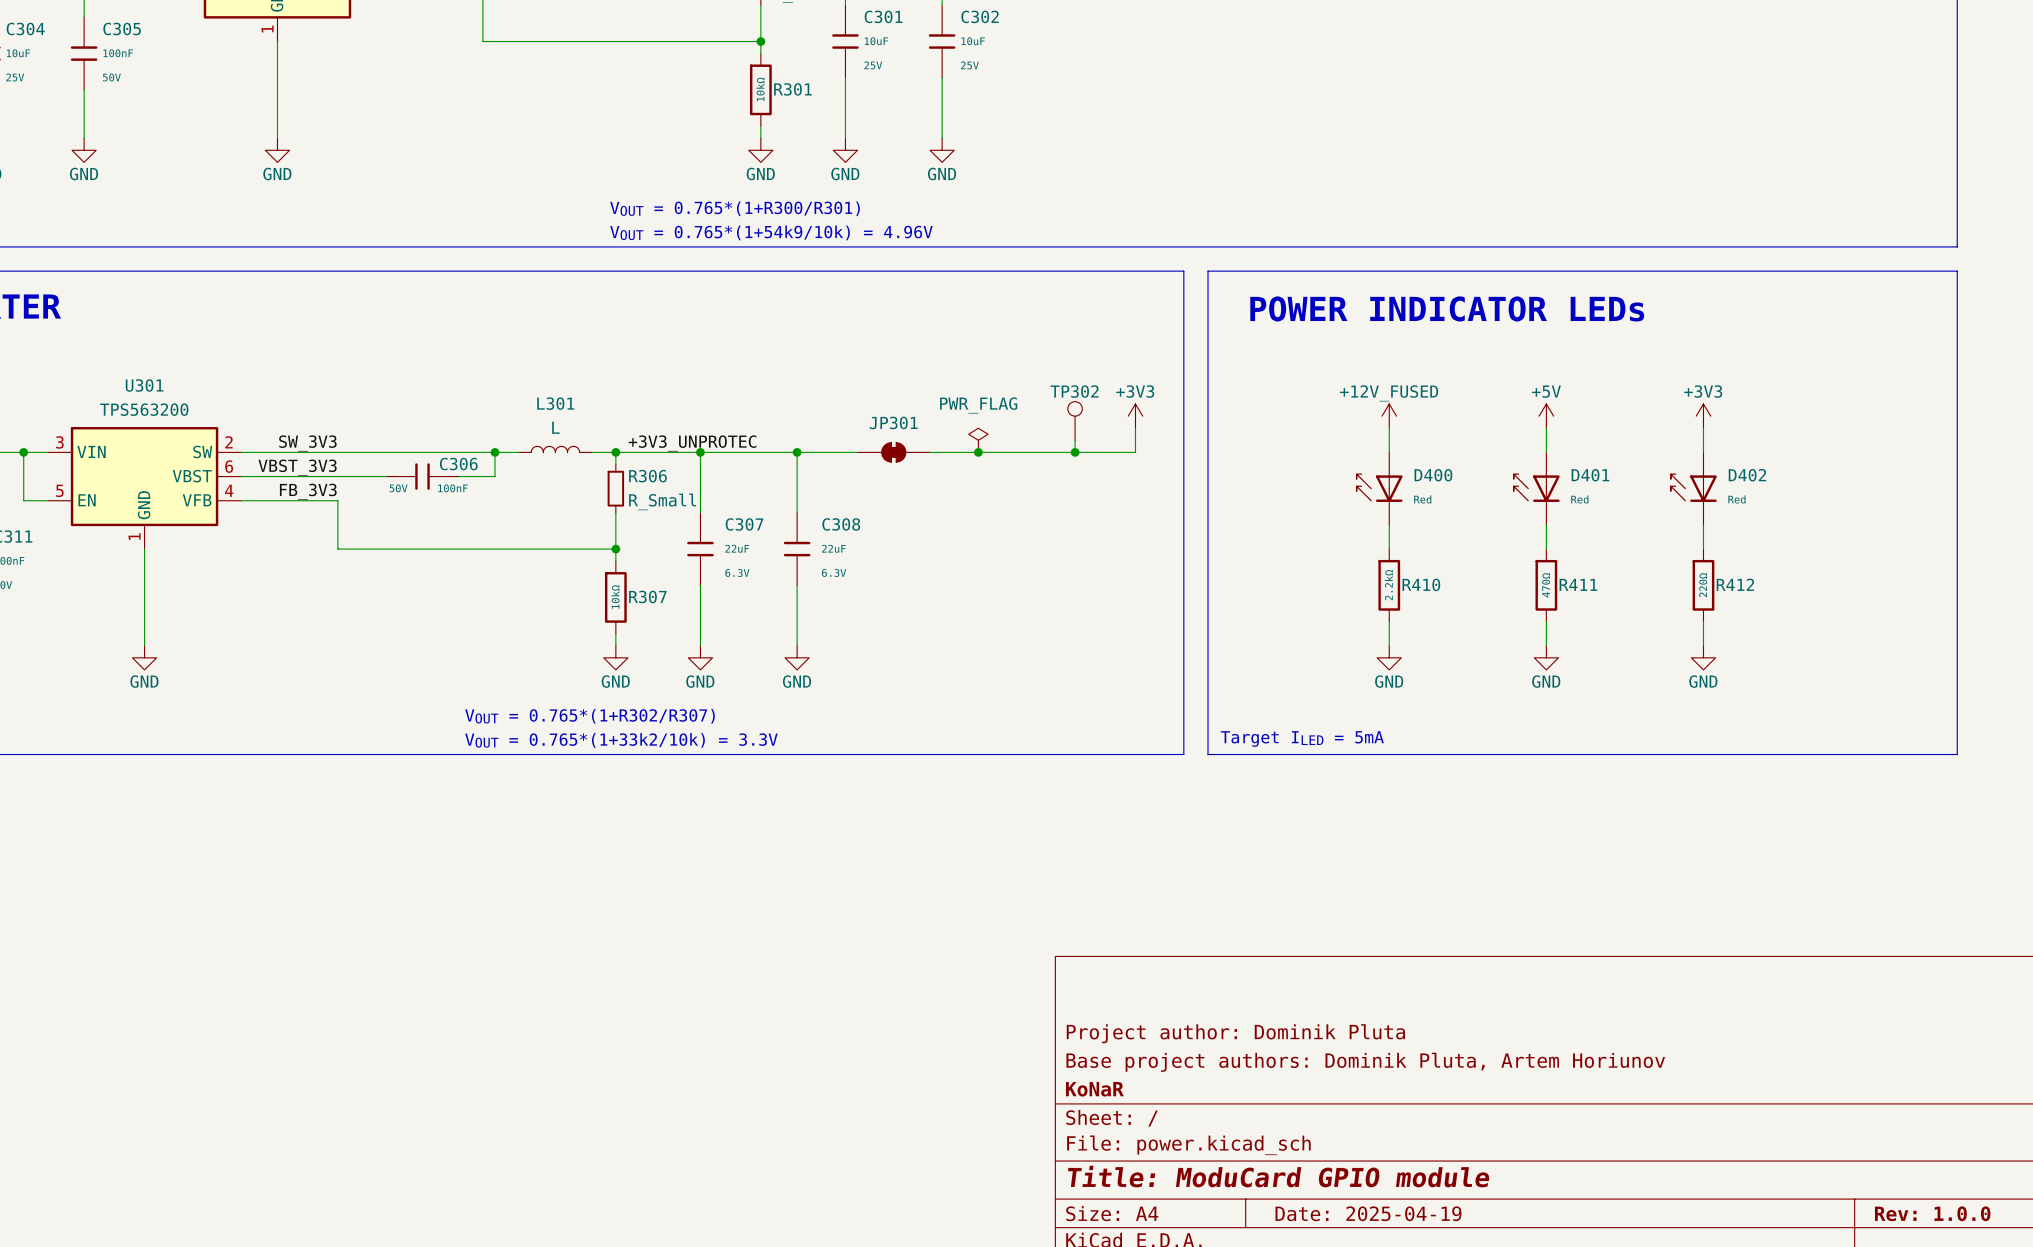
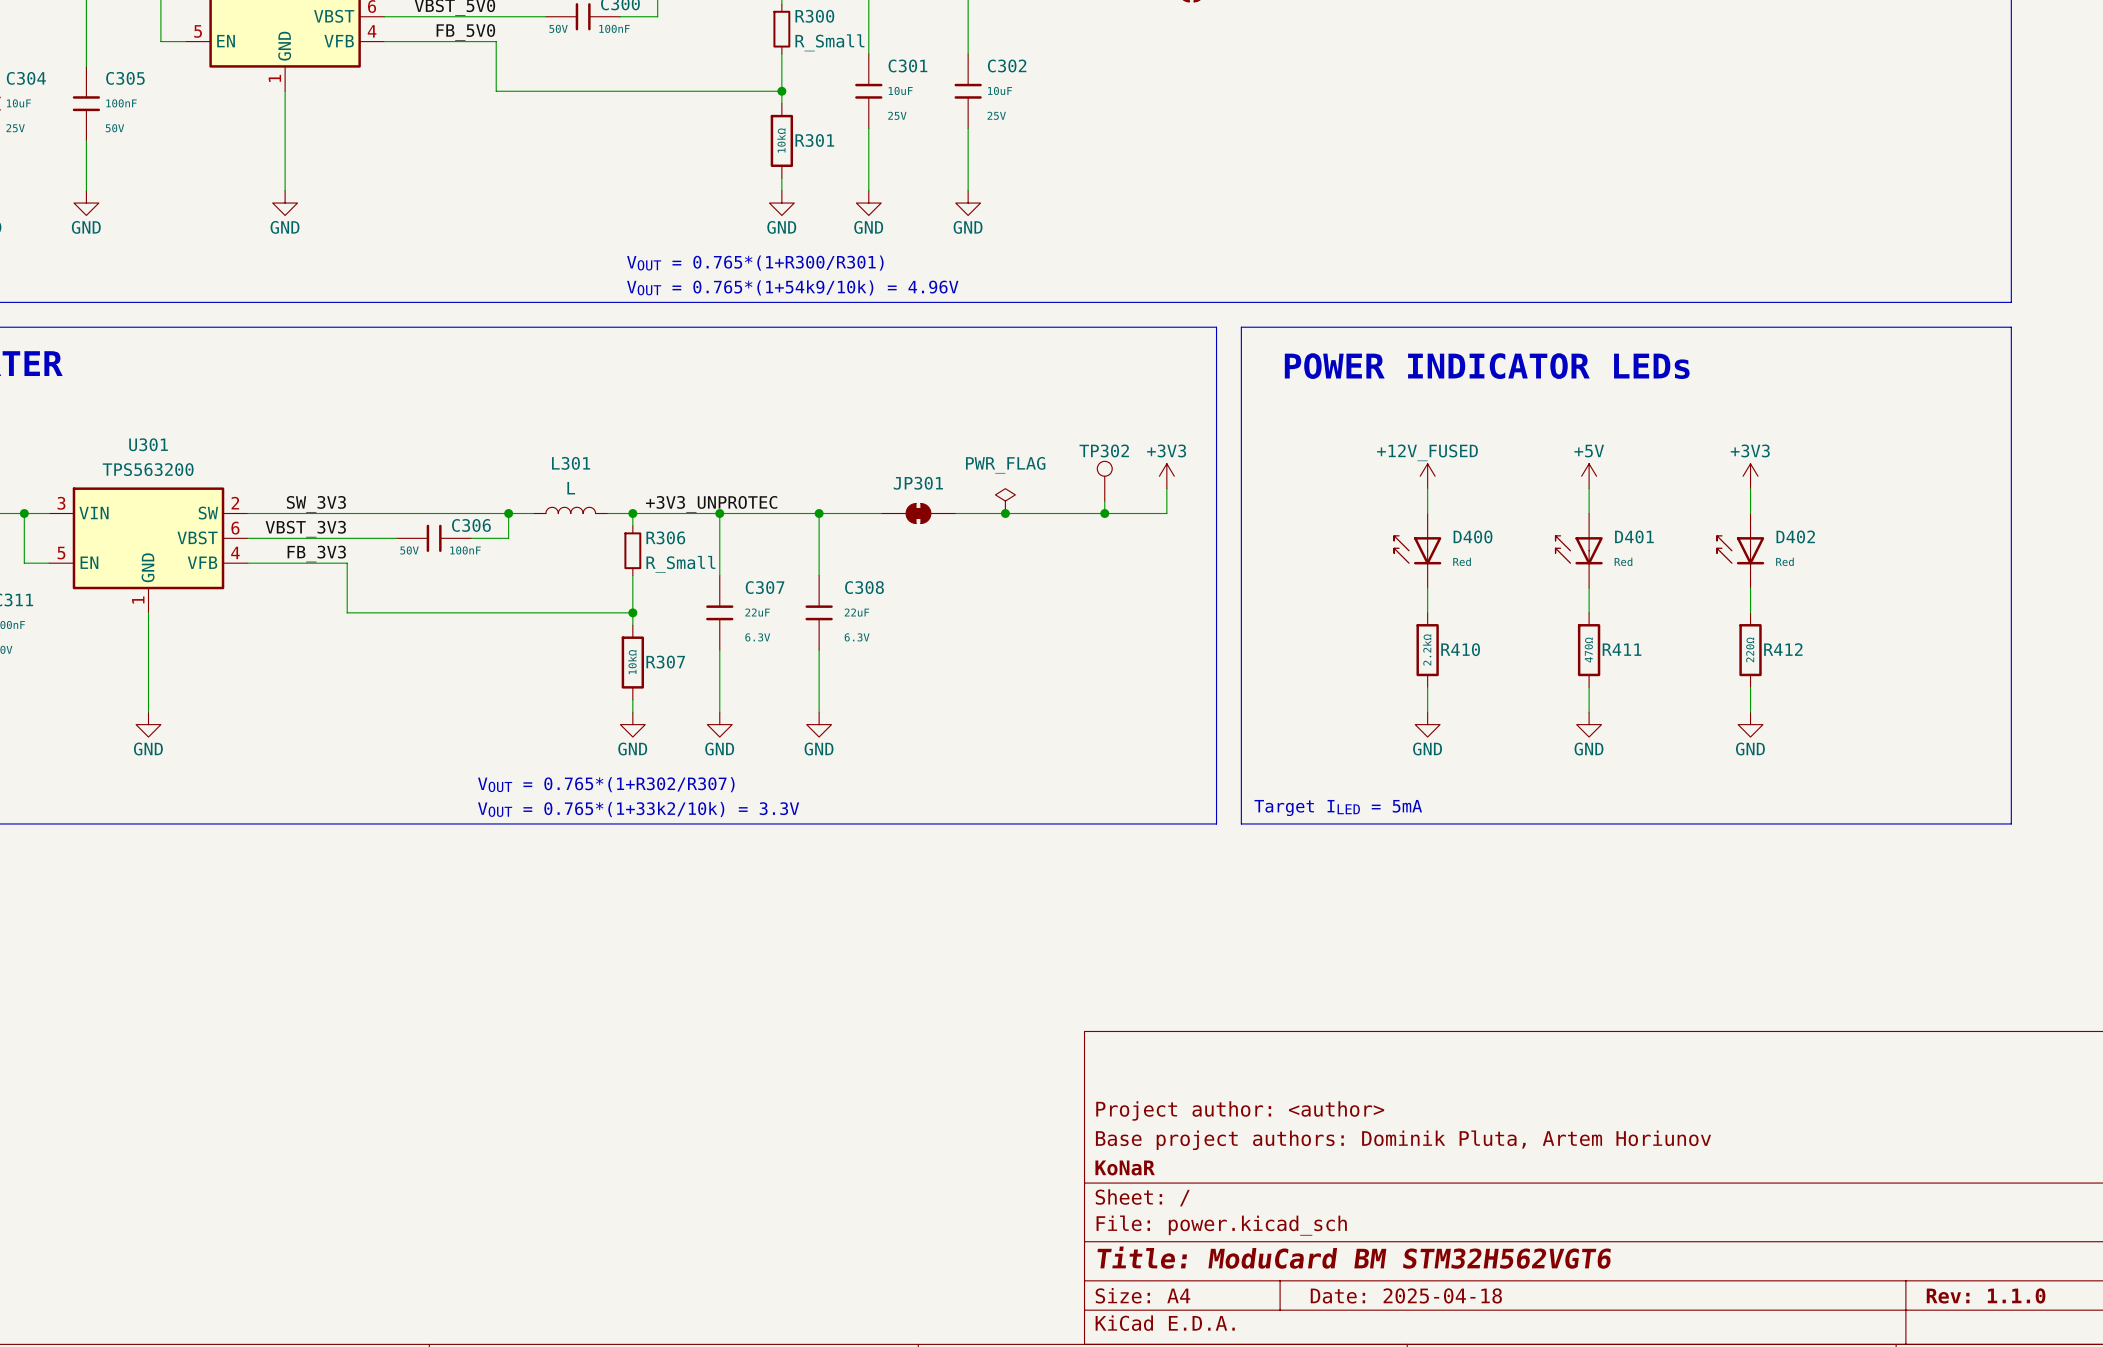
title block: Project author: Dominik Pluta (1235, 1033) -> Project author: <author> (1240, 1110)
title block: Title: ModuCard GPIO module (1278, 1176) -> Title: ModuCard BM STM32H562VGT6 (1354, 1257)
title block: Date: 2025-04-19 (1368, 1213) -> Date: 2025-04-18 (1406, 1295)
title block: Rev: 1.0.0 (1932, 1213) -> Rev: 1.1.0 (1986, 1295)

